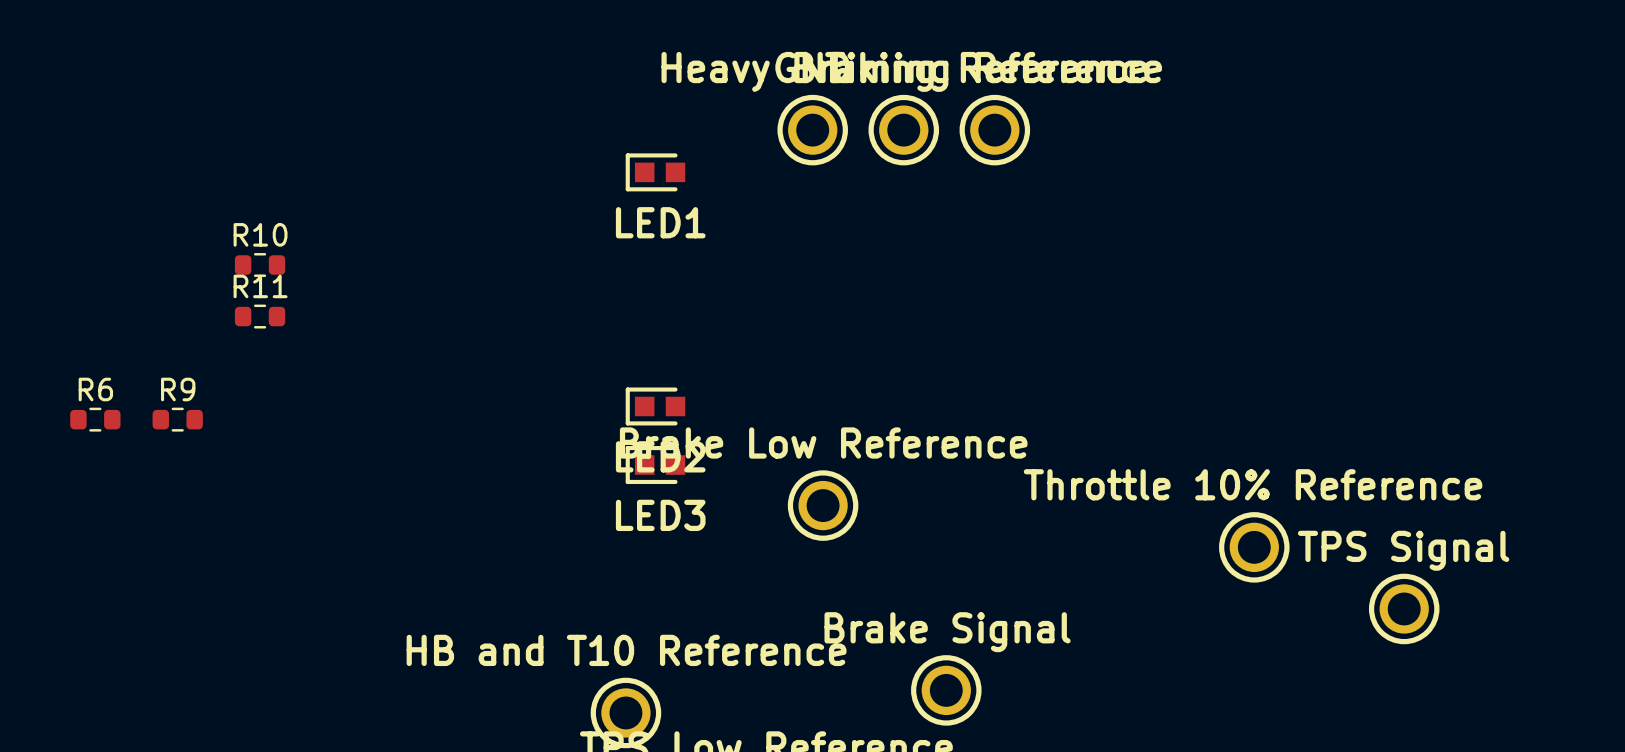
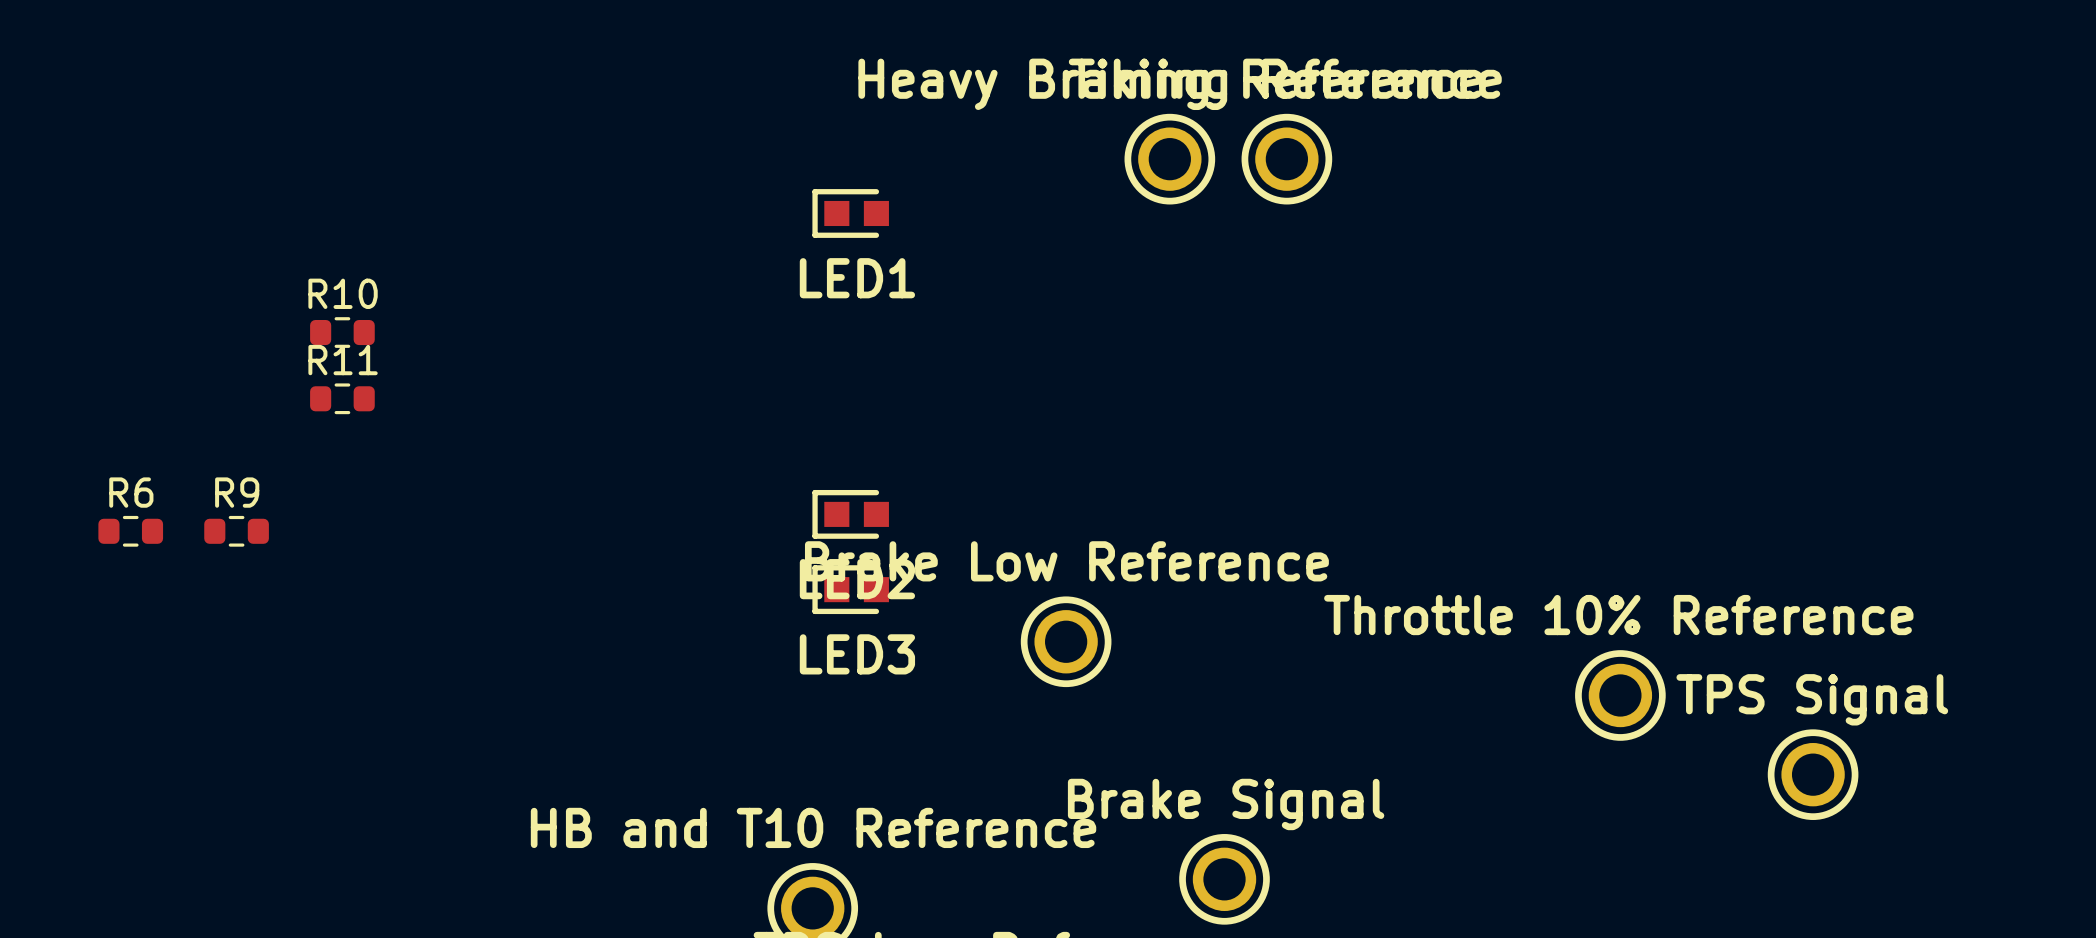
part: (812, 130) -> none

